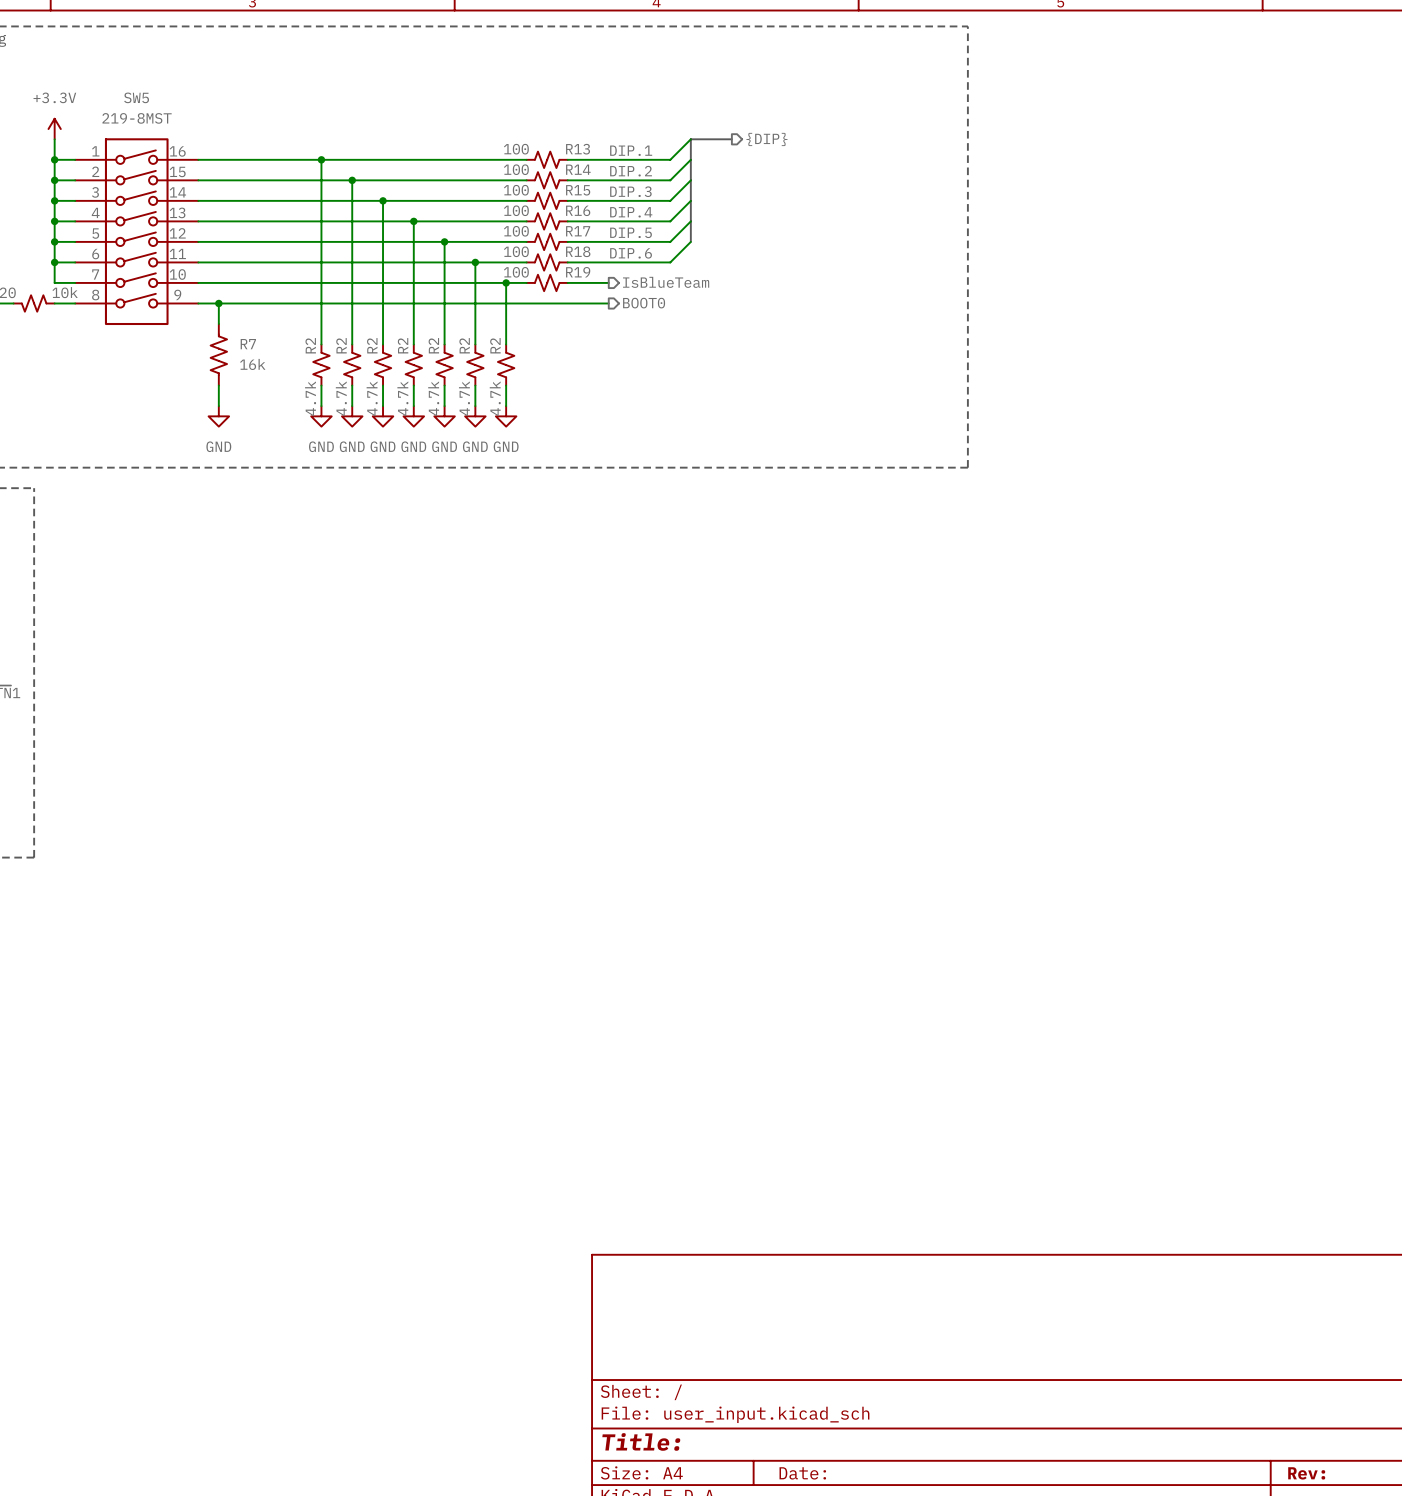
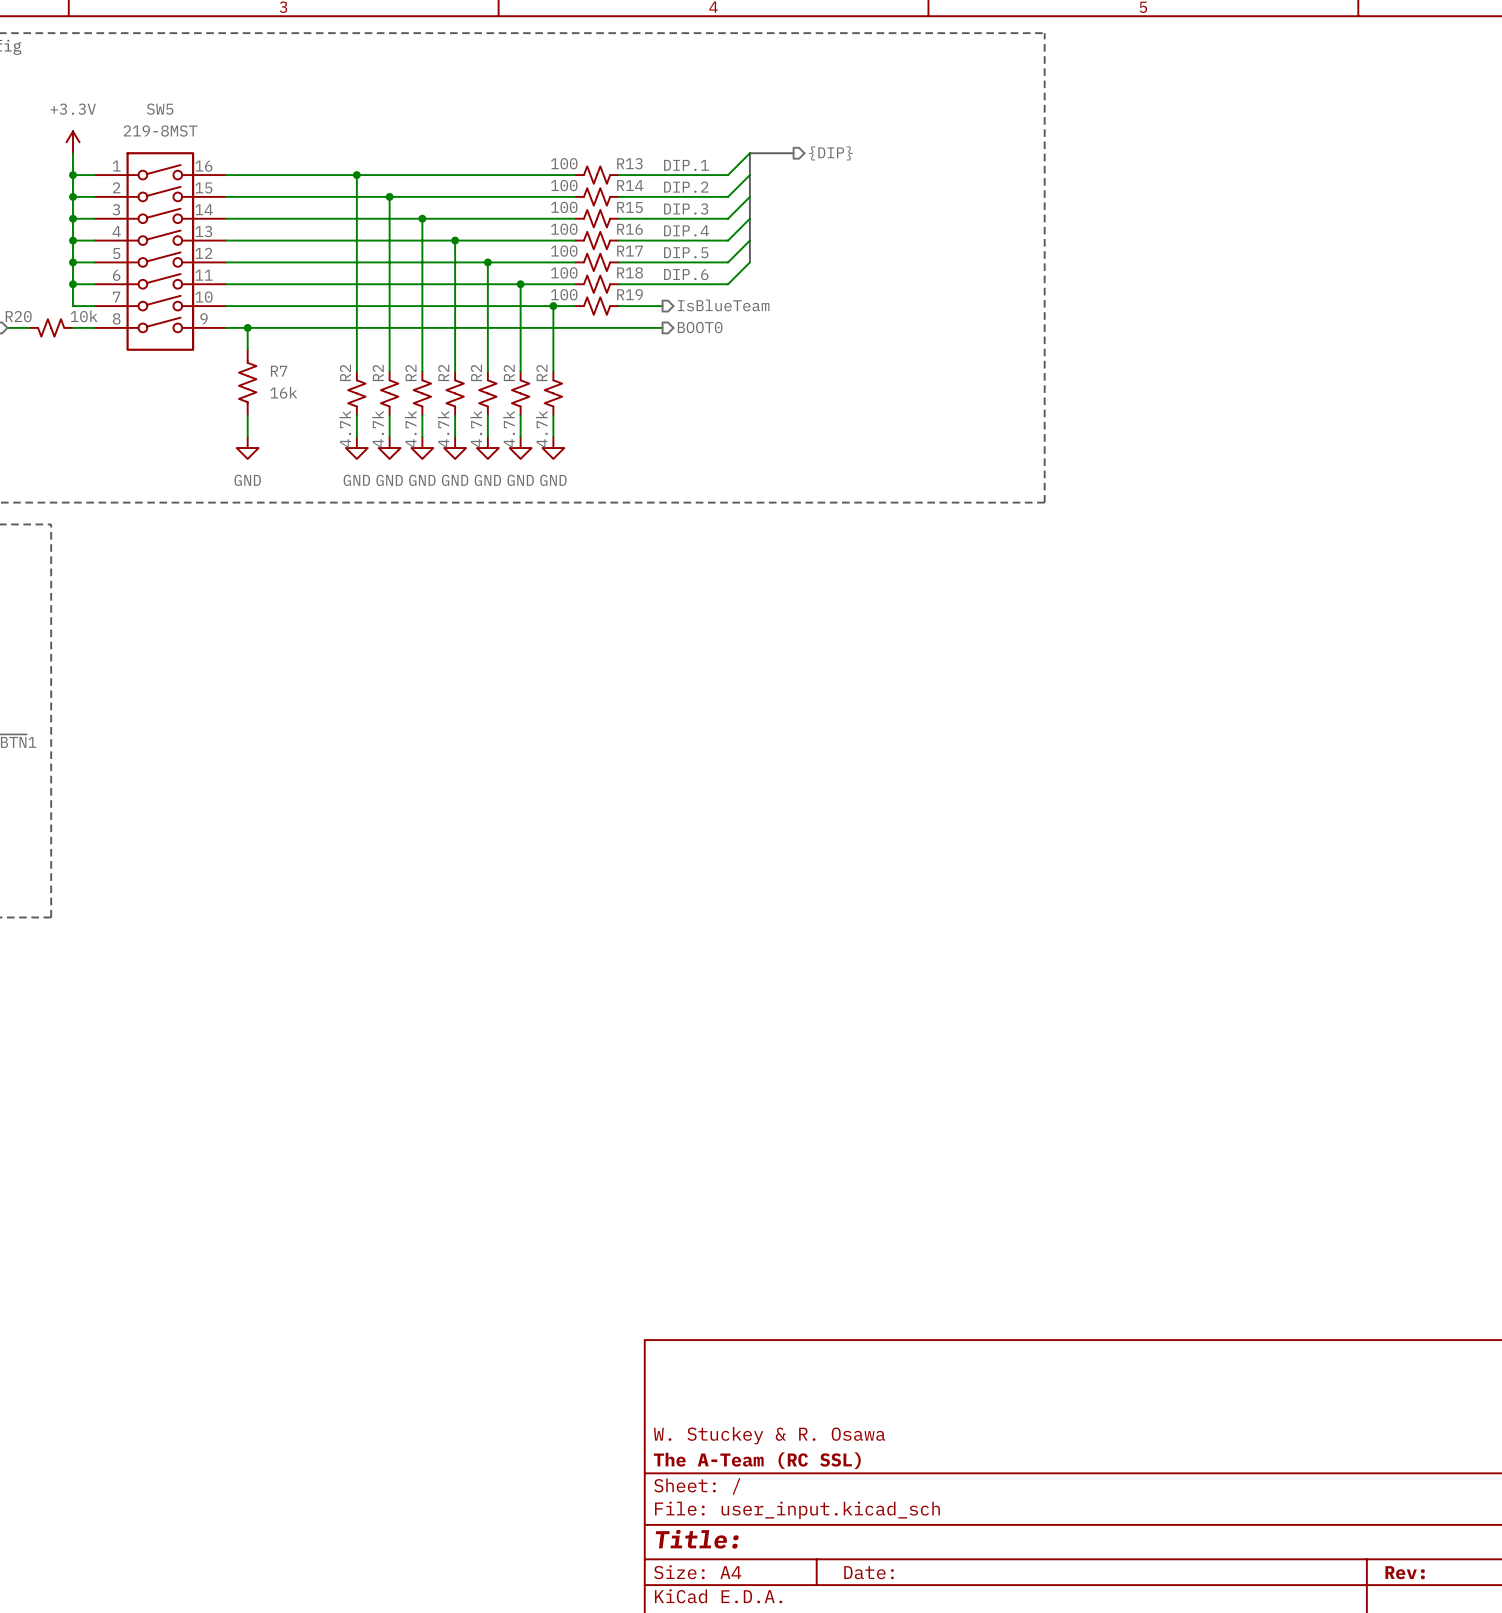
title block: none -> W. Stuckey & R. Osawa (769, 1435)
title block: none -> The A-Team (RC SSL) (757, 1460)

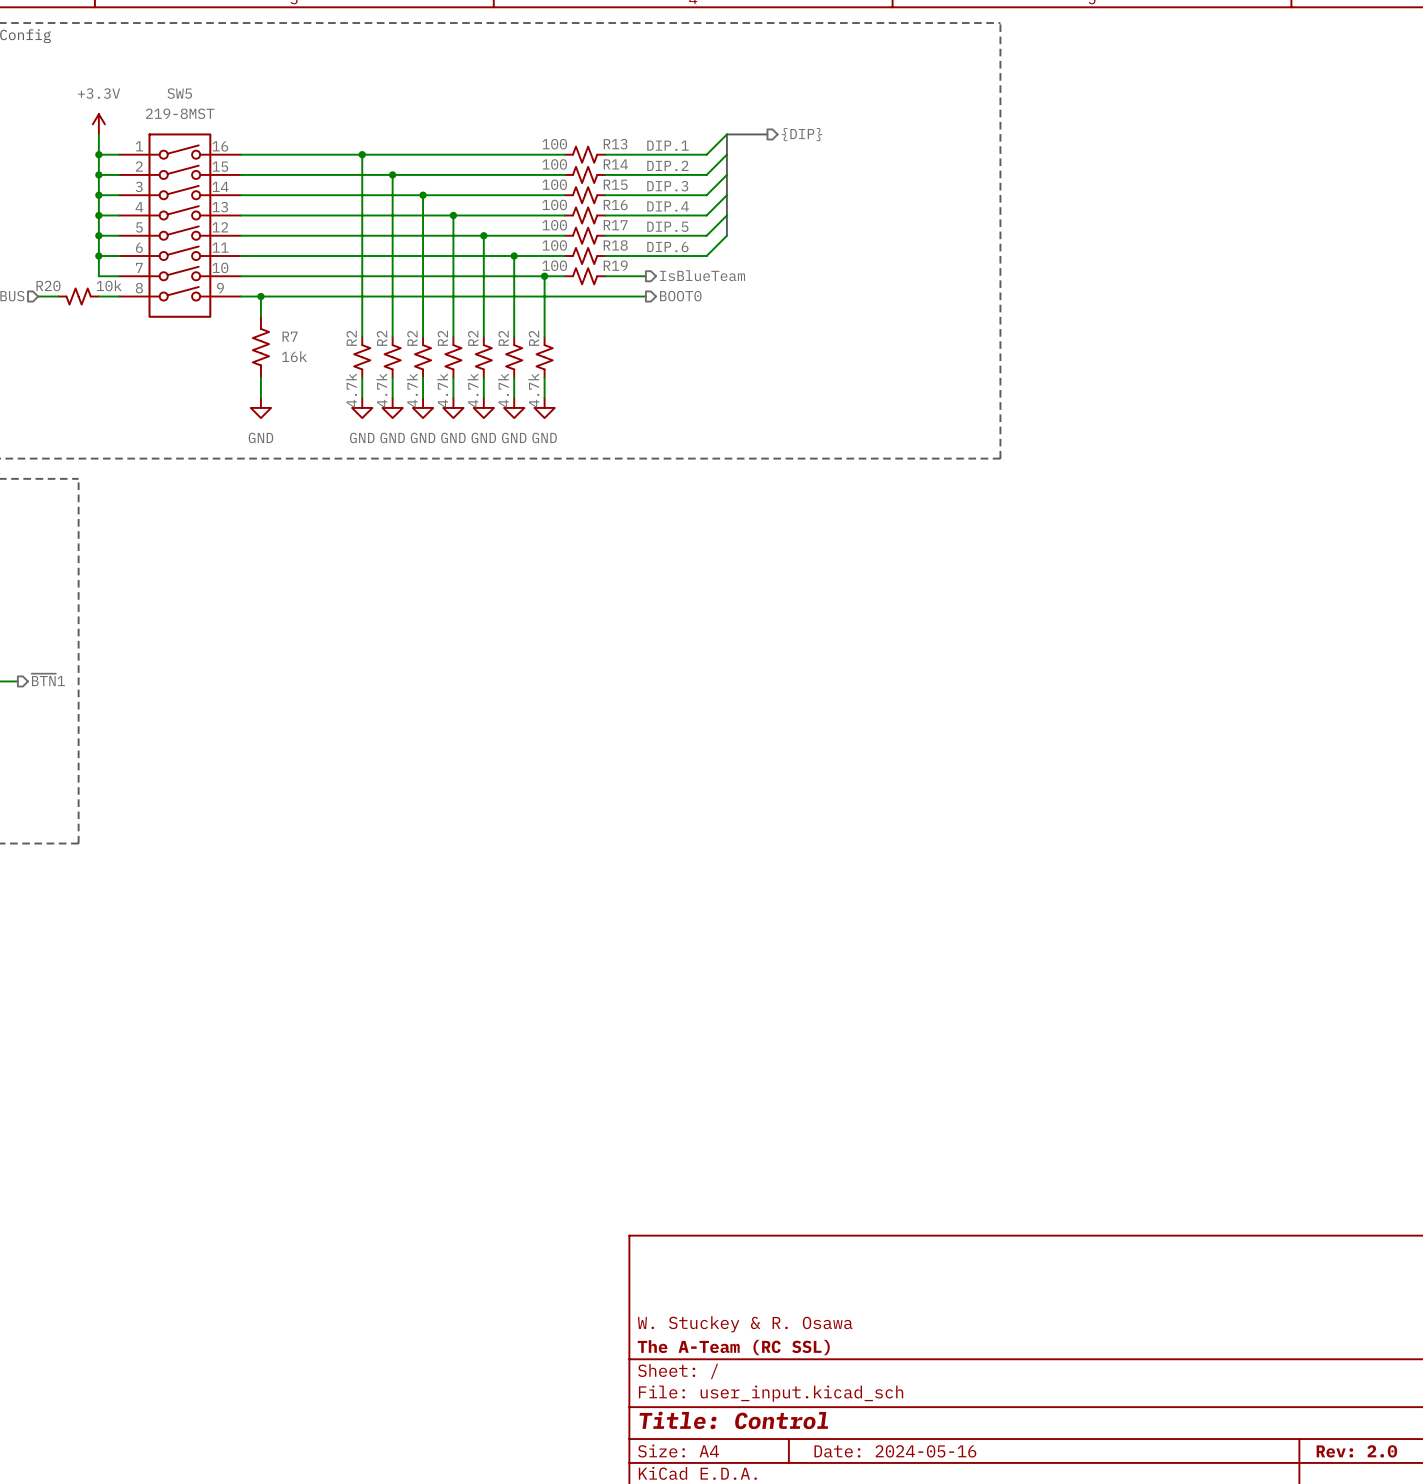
title block: Title: (697, 1539) -> Title: Control (733, 1420)
title block: Date: (868, 1572) -> Date: 2024-05-16 (895, 1451)
title block: Rev: (1405, 1572) -> Rev: 2.0 (1356, 1451)

